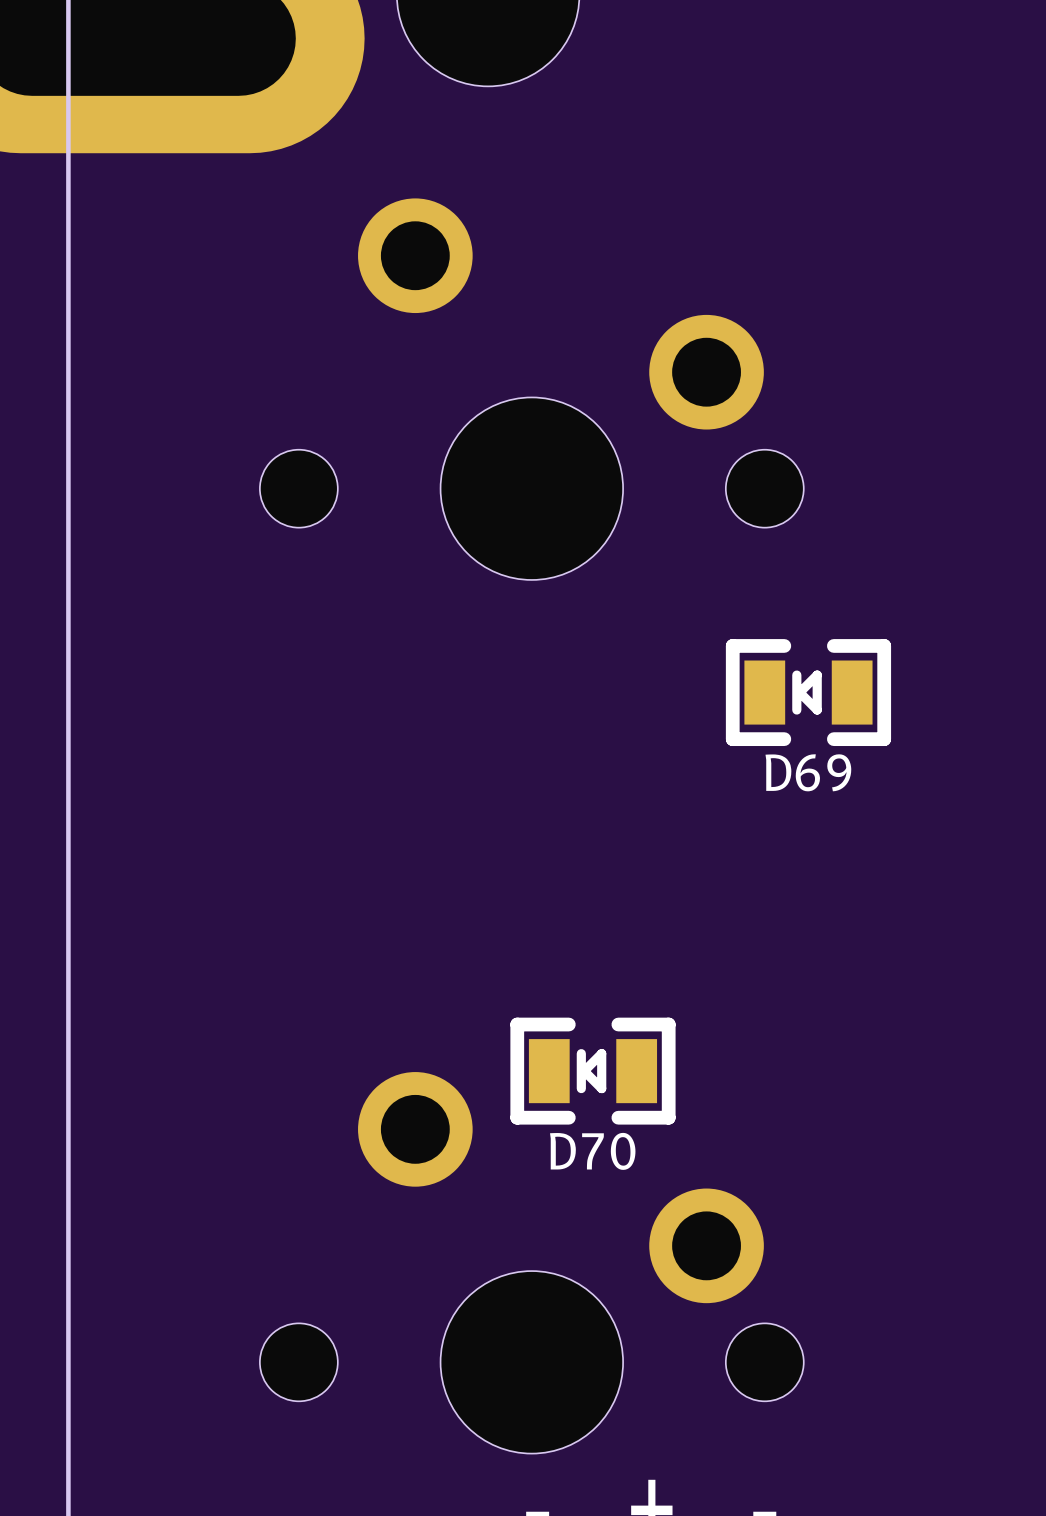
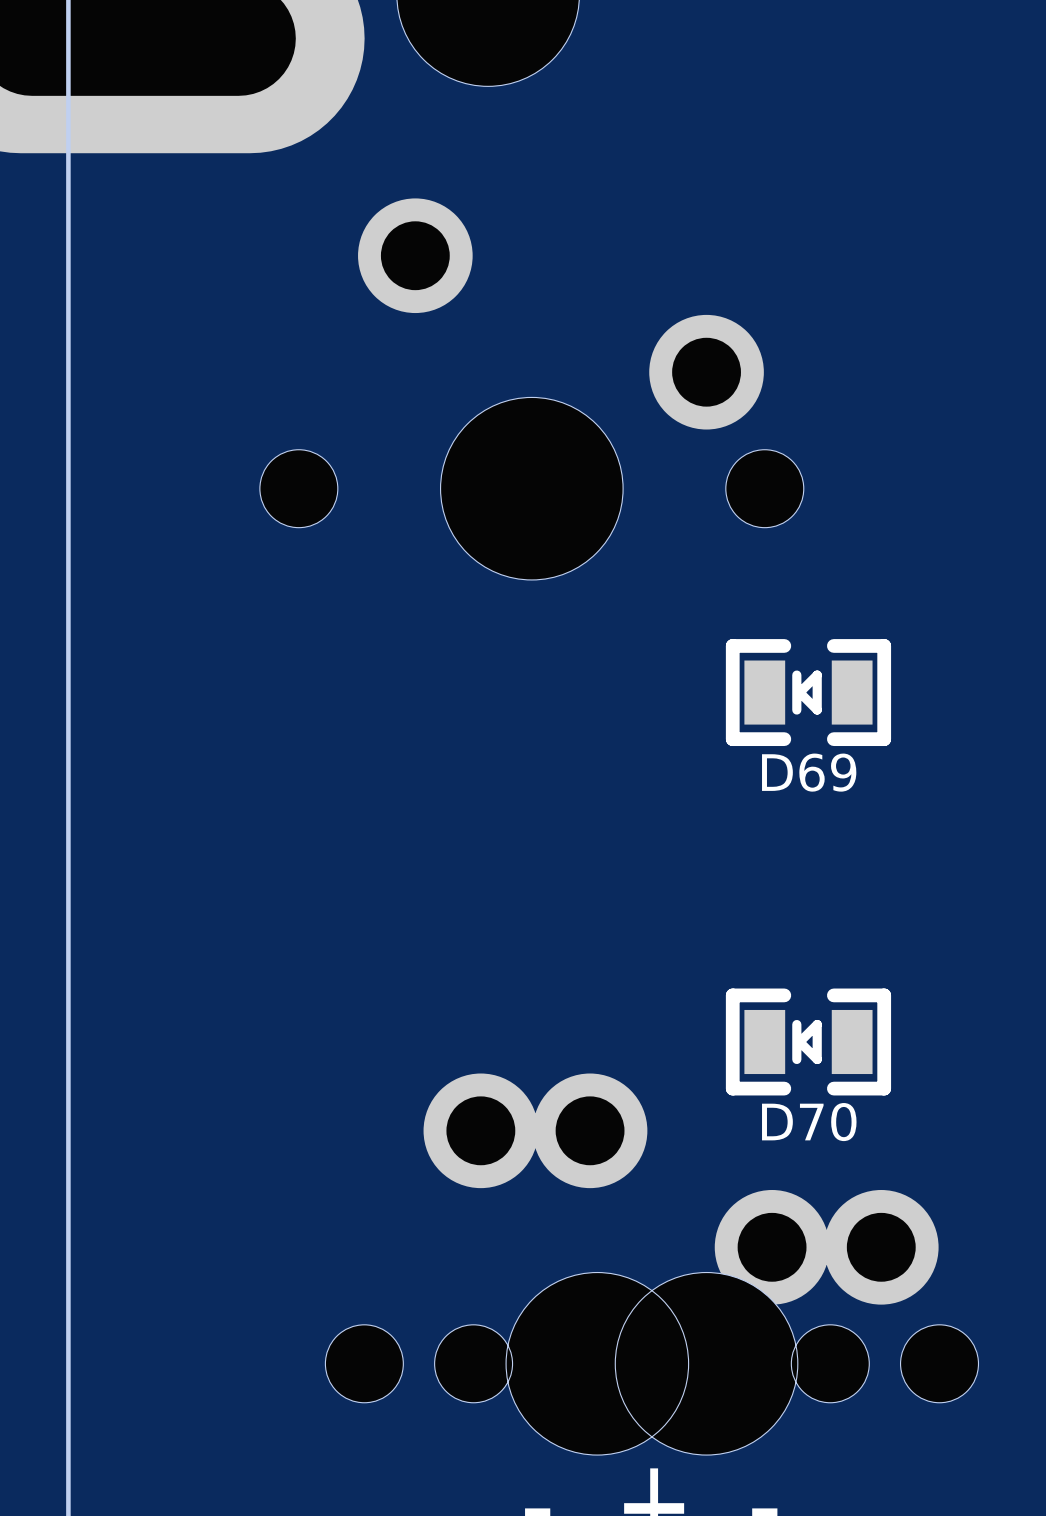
D70 position: (592, 1071) -> (808, 1042)
part position: (531, 1262) -> (597, 1264)
part: none -> (706, 1264)

